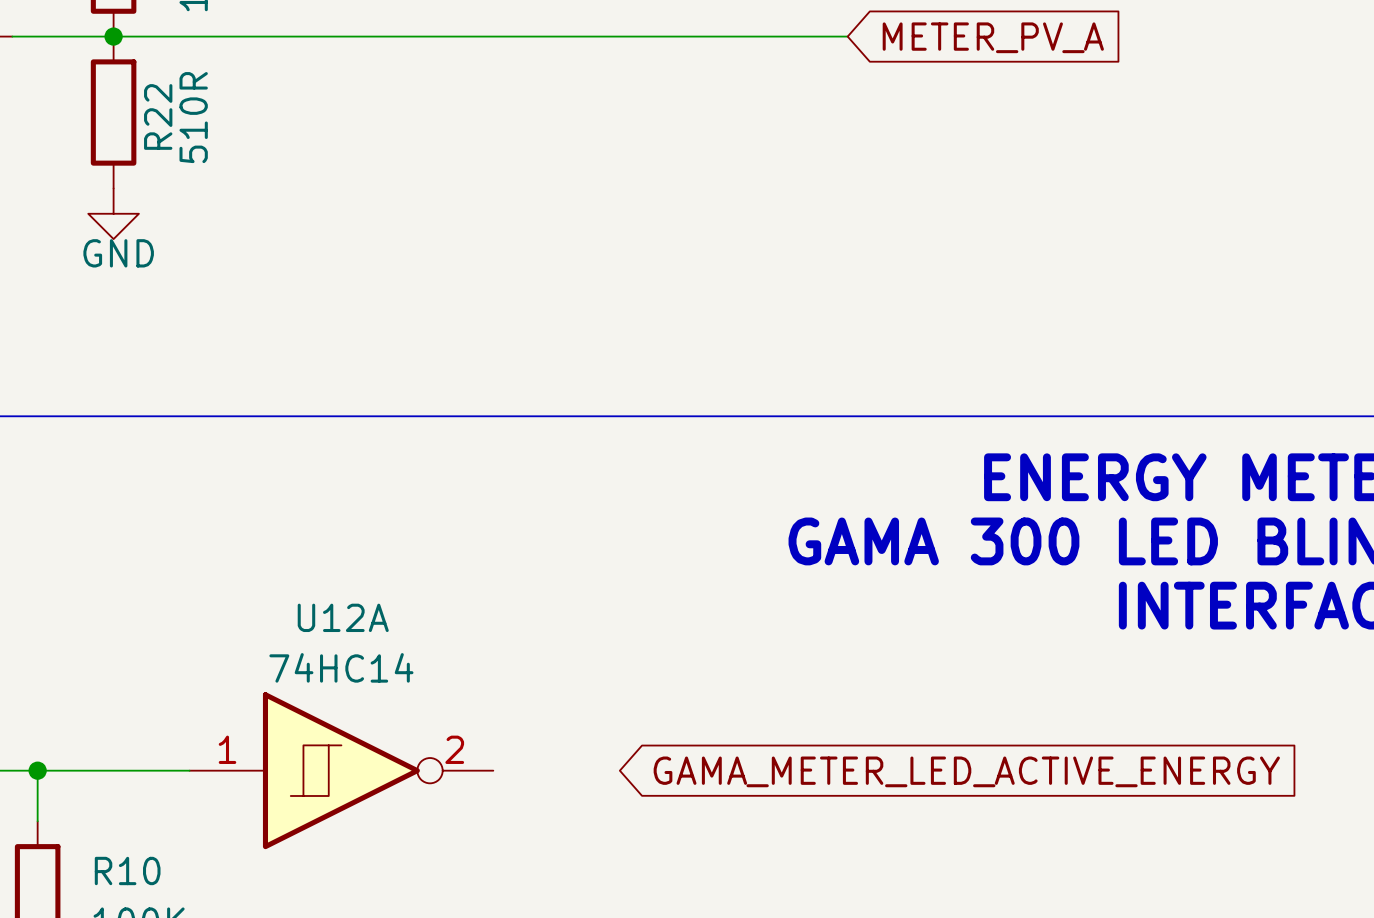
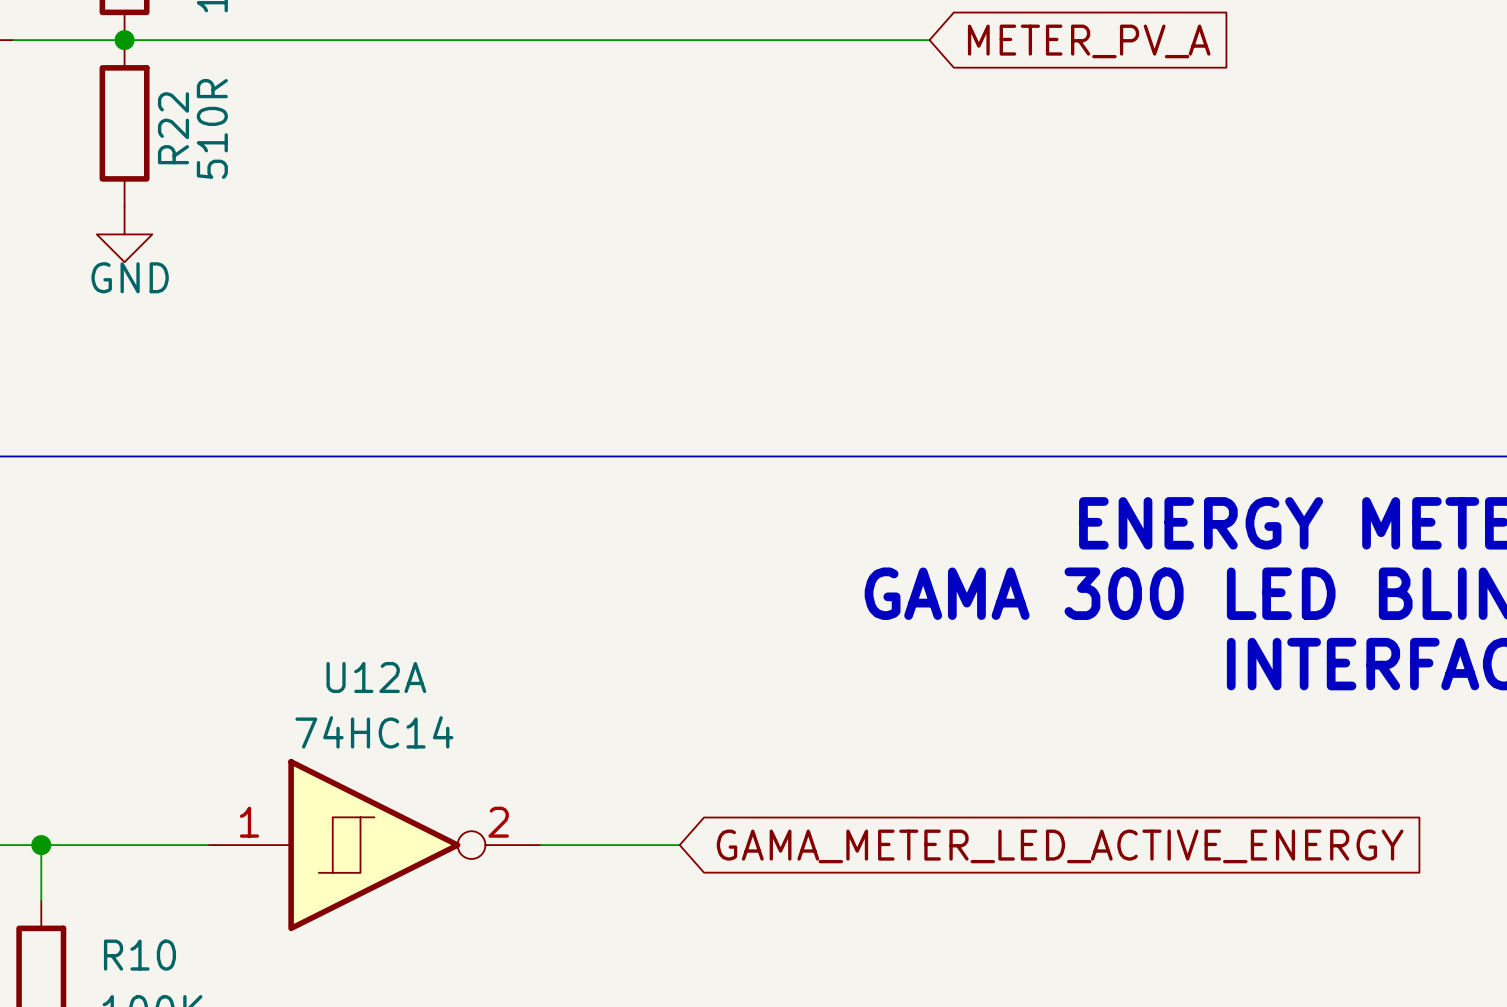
wire: none -> (540, 845) (679, 845)

